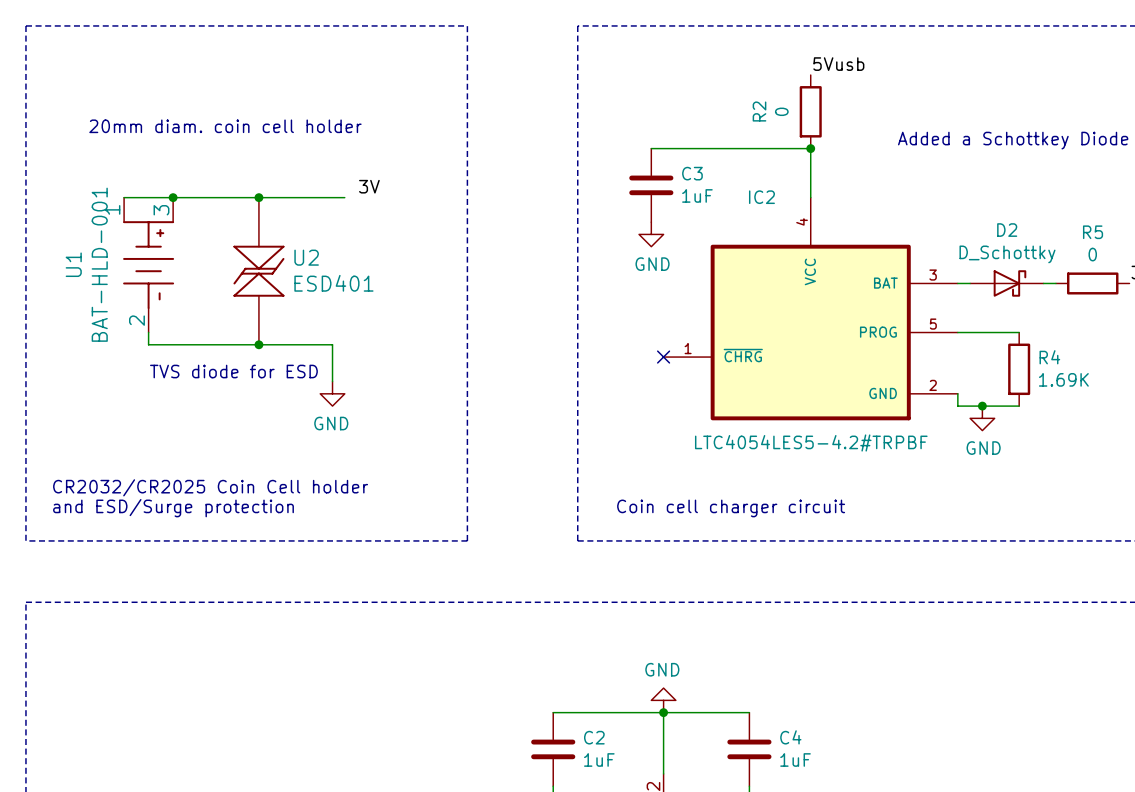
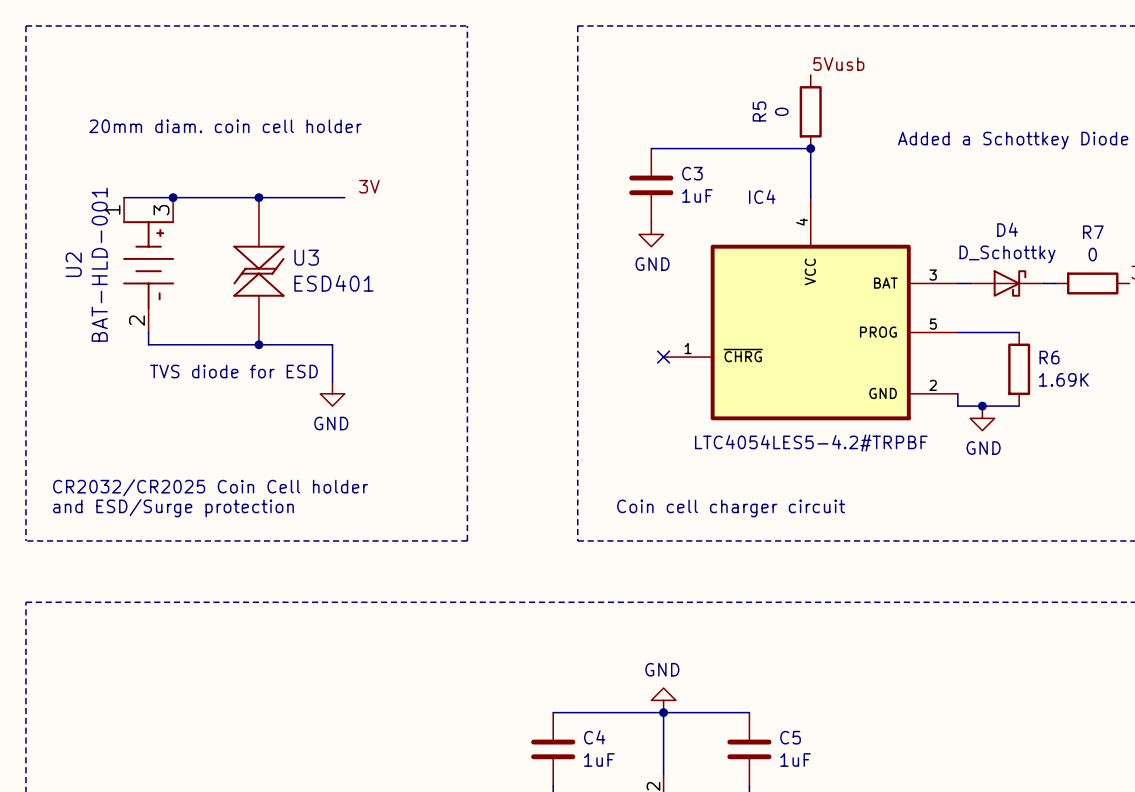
R2 name: R2 (759, 111) -> R5 (759, 111)
IC2 name: IC2 (761, 197) -> IC4 (762, 196)
D2 name: D2 (1007, 230) -> D4 (1007, 229)
R5 name: R5 (1093, 232) -> R7 (1093, 232)
U2 name: U2 (306, 257) -> U3 (306, 257)
U1 name: U1 (73, 264) -> U2 (73, 264)
R4 name: R4 (1049, 357) -> R6 (1049, 357)
C2 name: C2 (594, 737) -> C4 (594, 737)
C4 name: C4 (790, 737) -> C5 (790, 737)

